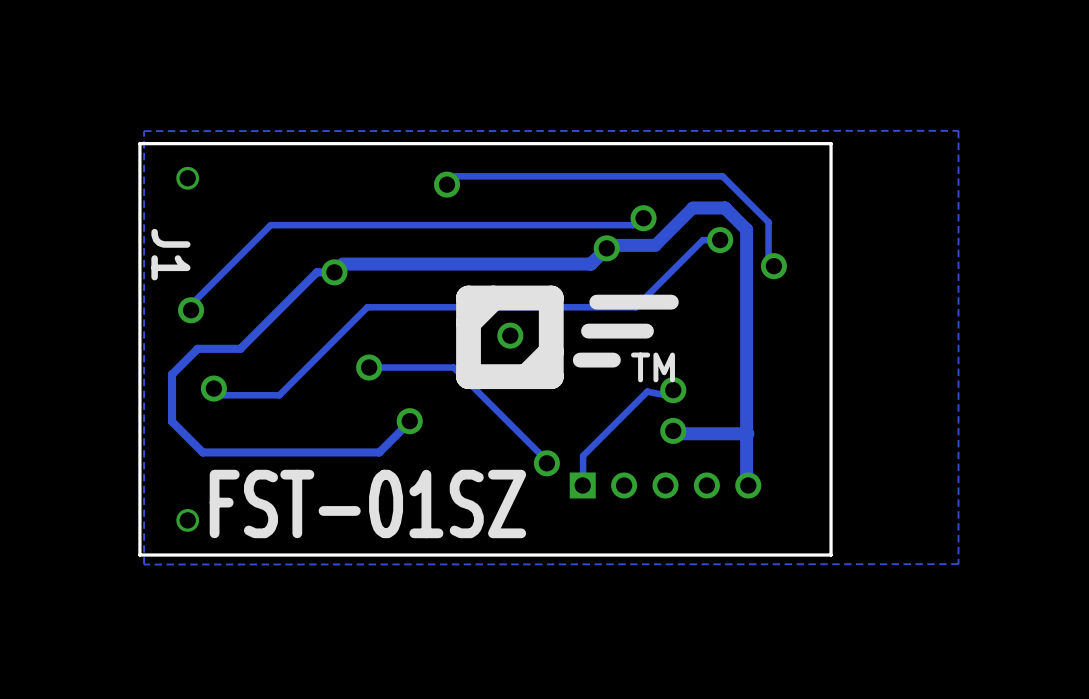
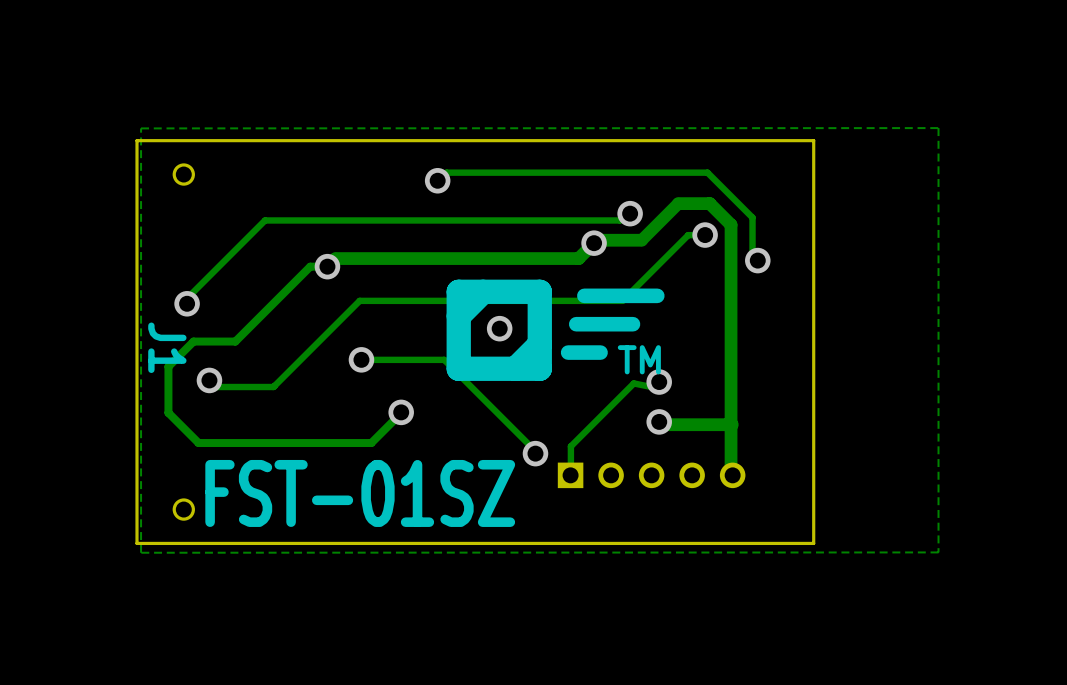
text position: J1 (170, 254) -> J1 (167, 347)

